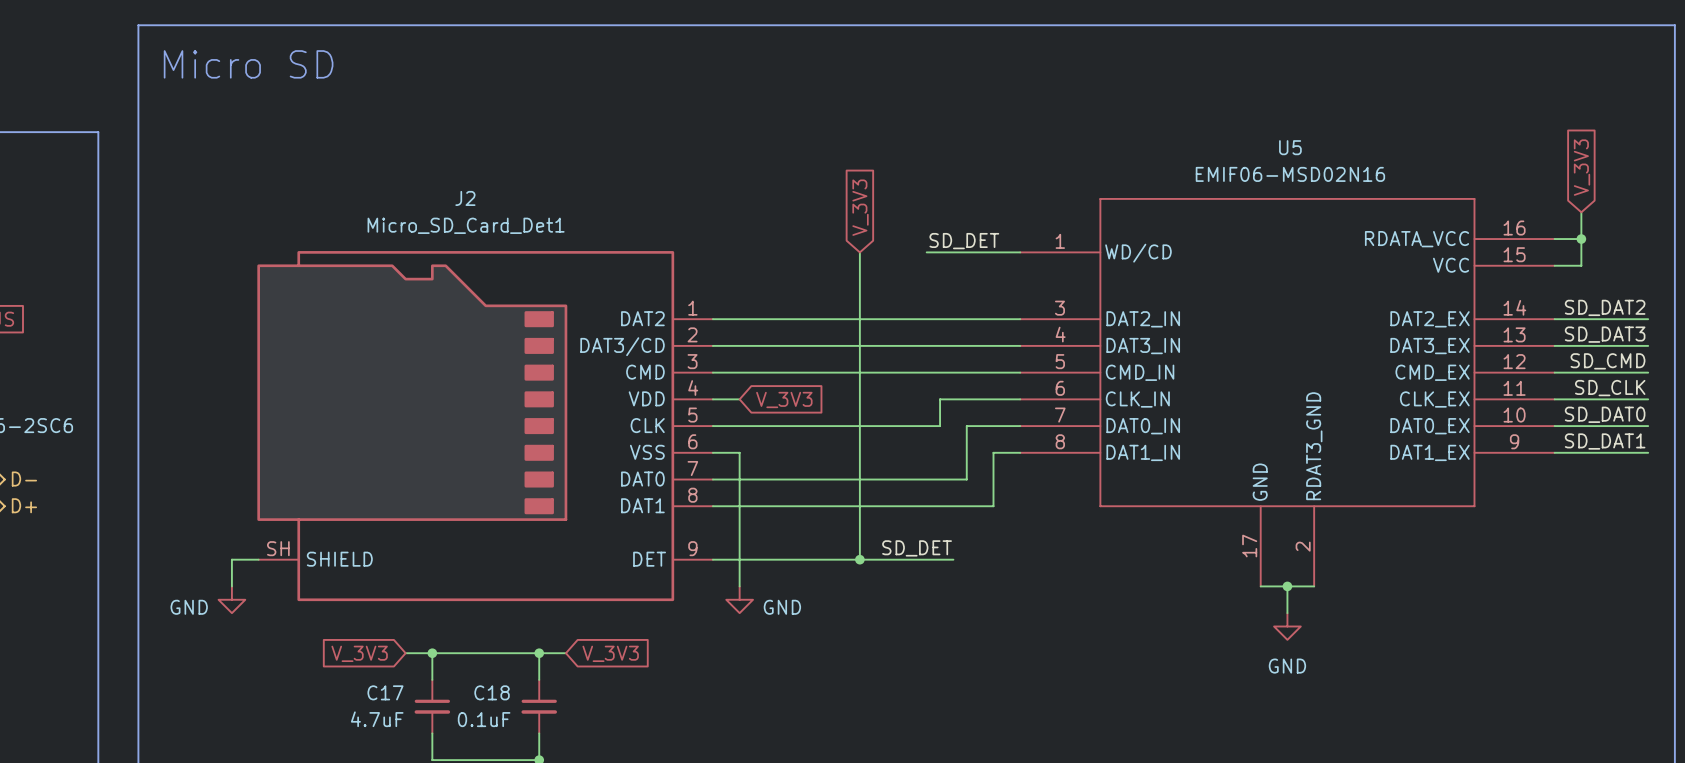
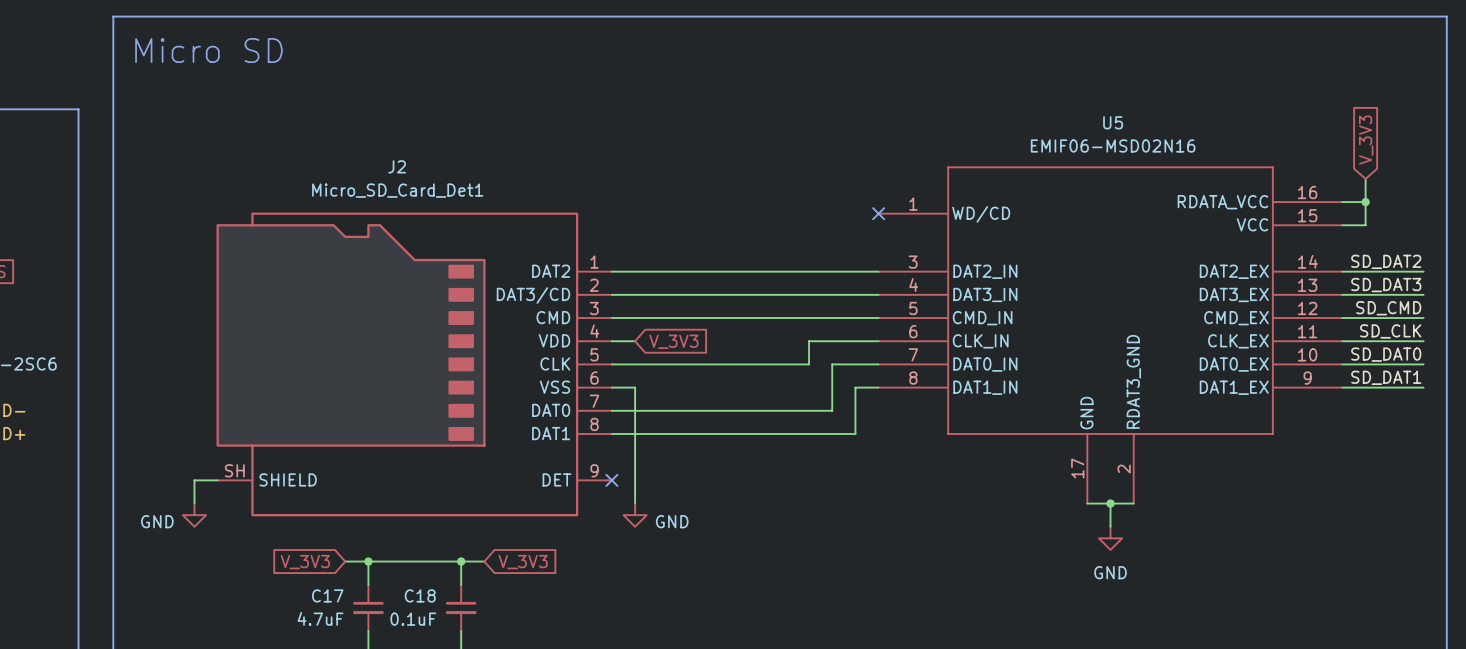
global label: V_3V3 (860, 207) -> none
label: SD_DET (964, 241) -> none
wire: (859, 252) (859, 559) -> none
wire: (926, 252) (1020, 252) -> none
no-connect mark: none -> (878, 213)
label: SD_DET (917, 548) -> none
wire: (712, 559) (953, 559) -> none
no-connect mark: none -> (611, 480)
junction: (859, 559) -> none

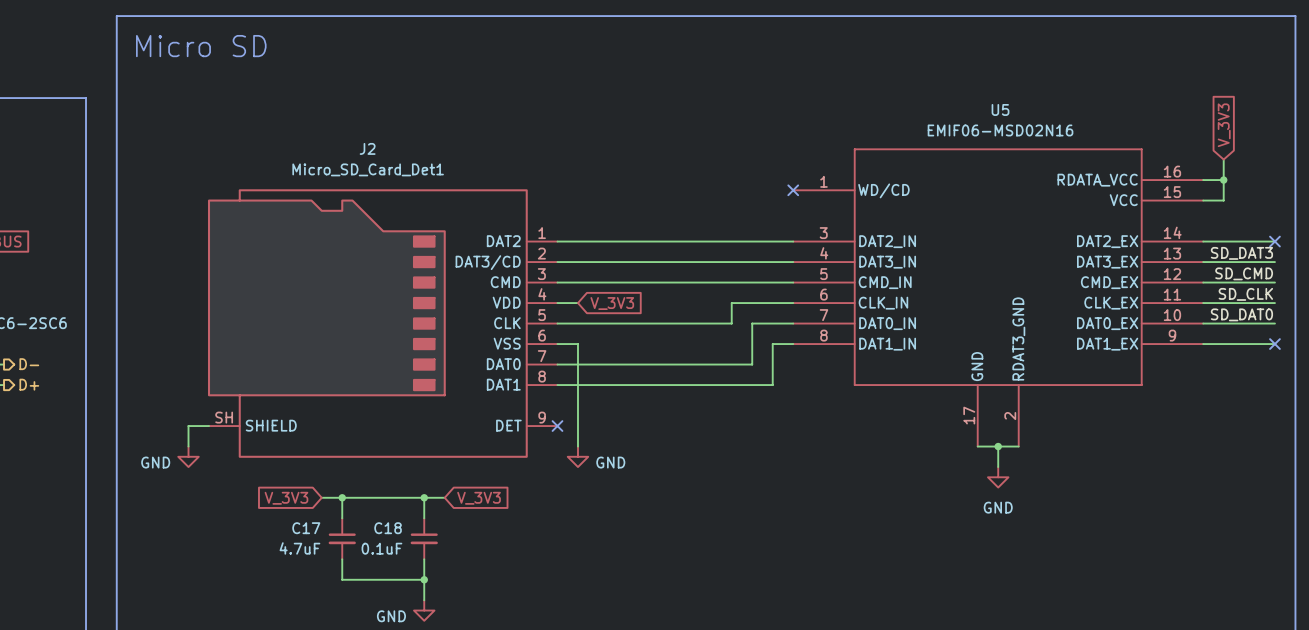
label: SD_DAT2 (1386, 261) -> none
no-connect mark: none -> (1274, 241)
label: SD_DAT1 (1386, 377) -> none
no-connect mark: none -> (1274, 344)

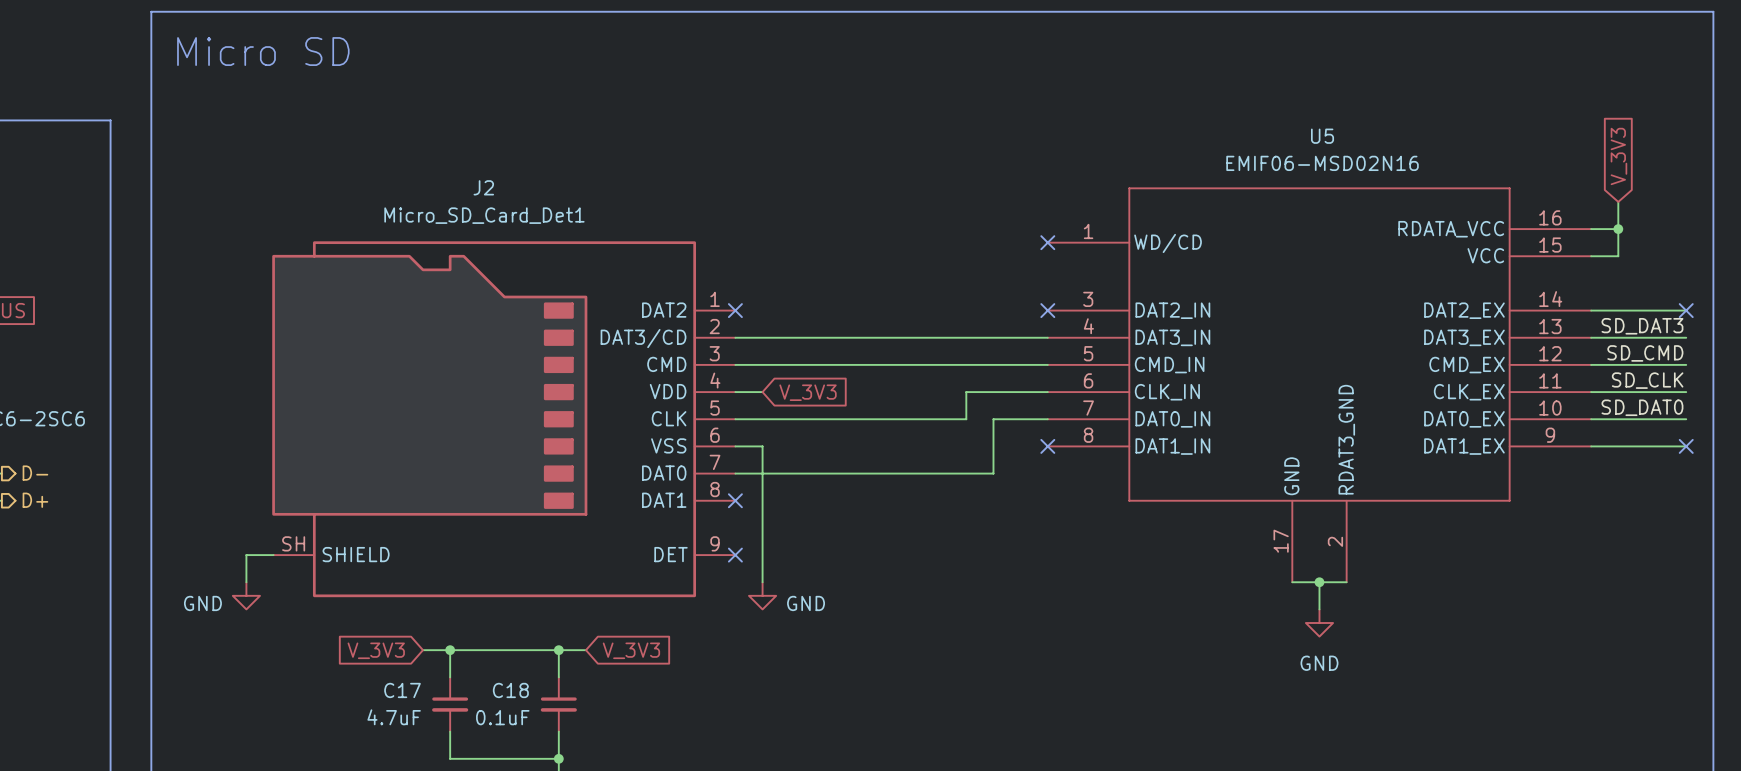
wire: (557, 241) (793, 241) -> none
no-connect mark: none -> (735, 310)
no-connect mark: none -> (1047, 310)
wire: (793, 344) (772, 344) (772, 385) (557, 385) -> none
no-connect mark: none -> (1047, 446)
no-connect mark: none -> (735, 500)

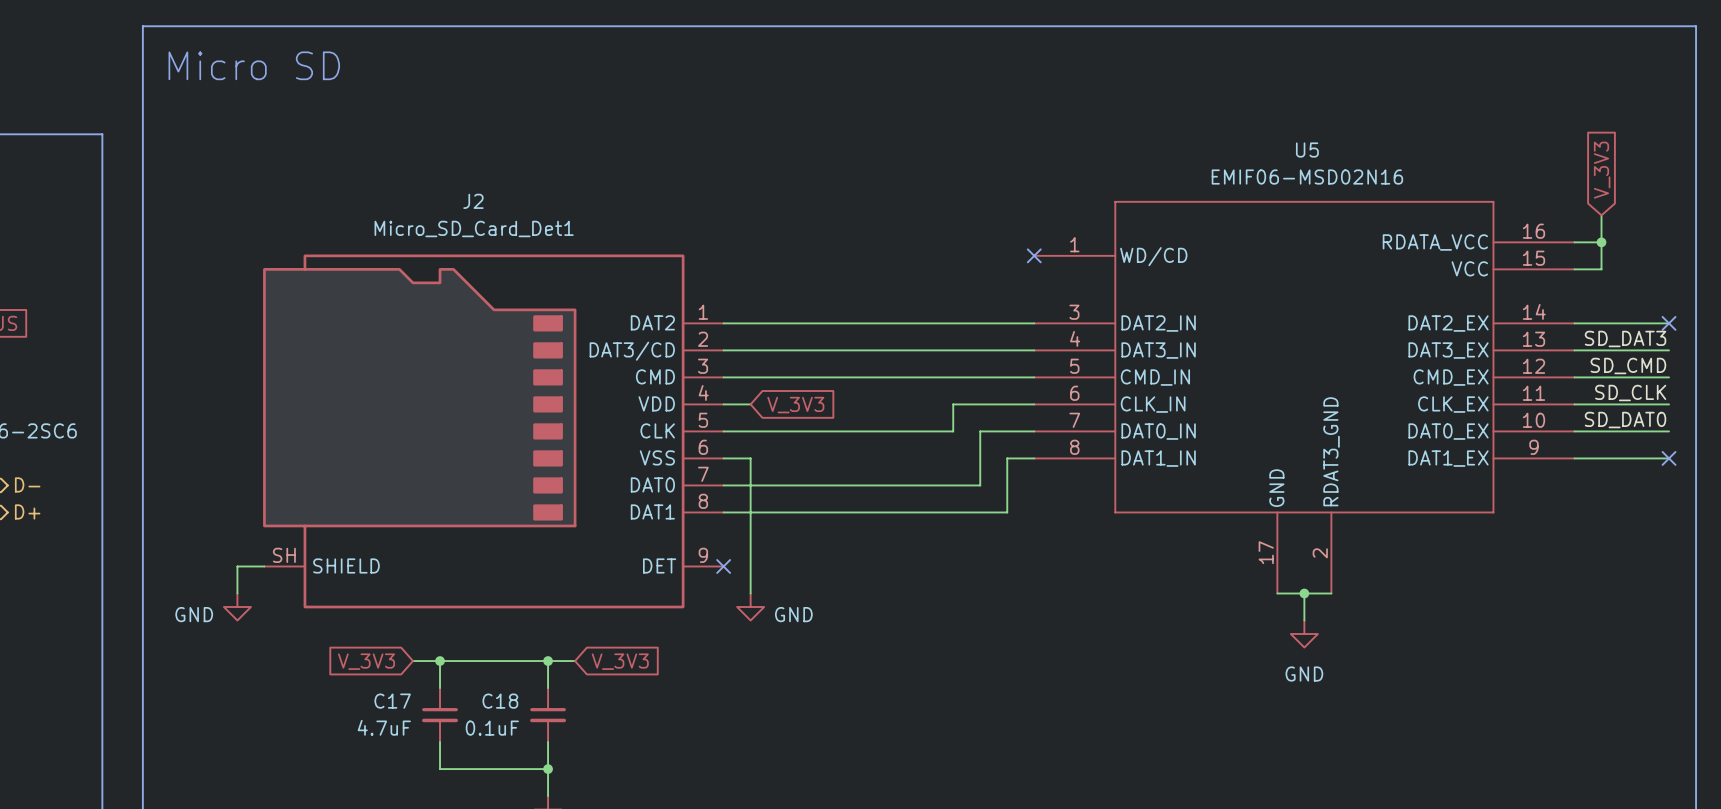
wire: none -> (723, 323) (1034, 323)
no-connect mark: (735, 310) -> none
no-connect mark: (1047, 310) -> none
wire: none -> (1034, 458) (1007, 458) (1007, 512) (723, 512)
no-connect mark: (1047, 446) -> none
no-connect mark: (735, 500) -> none

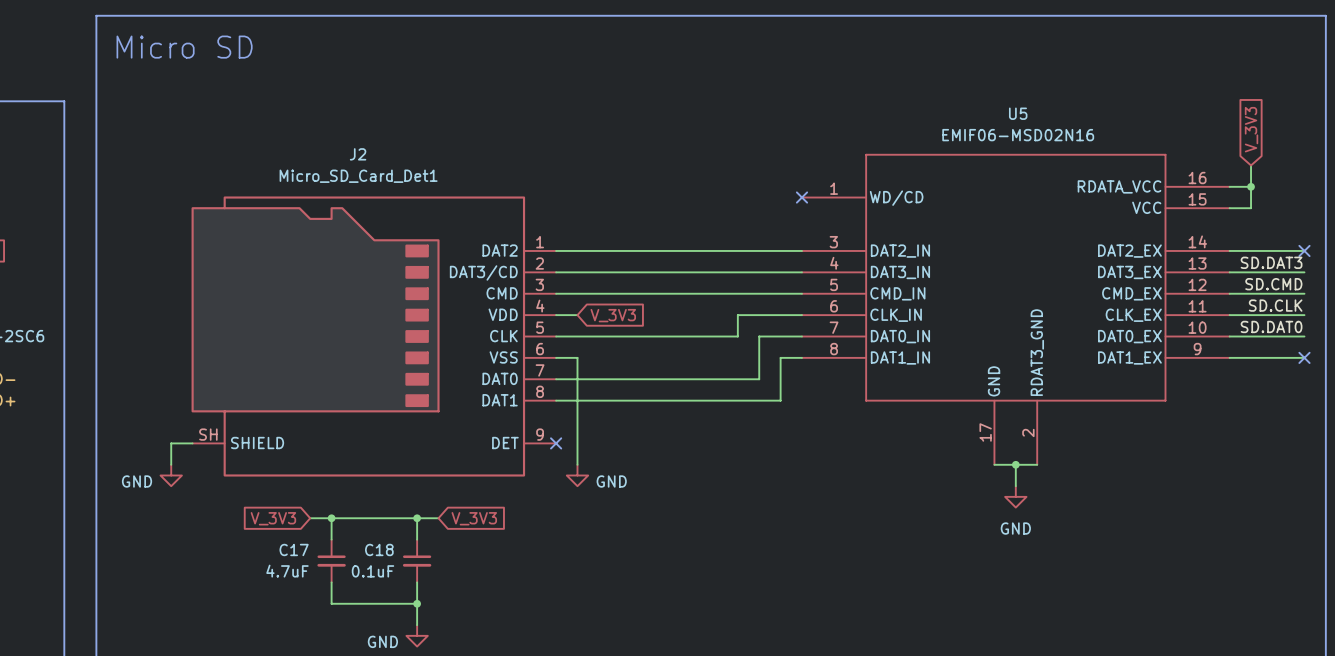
label: SD_DAT3 (1625, 338) -> SD.DAT3 (1271, 262)
label: SD_CMD (1628, 366) -> SD.CMD (1273, 284)
label: SD_CLK (1630, 393) -> SD.CLK (1275, 305)
label: SD_DAT0 (1625, 420) -> SD.DAT0 (1271, 326)

